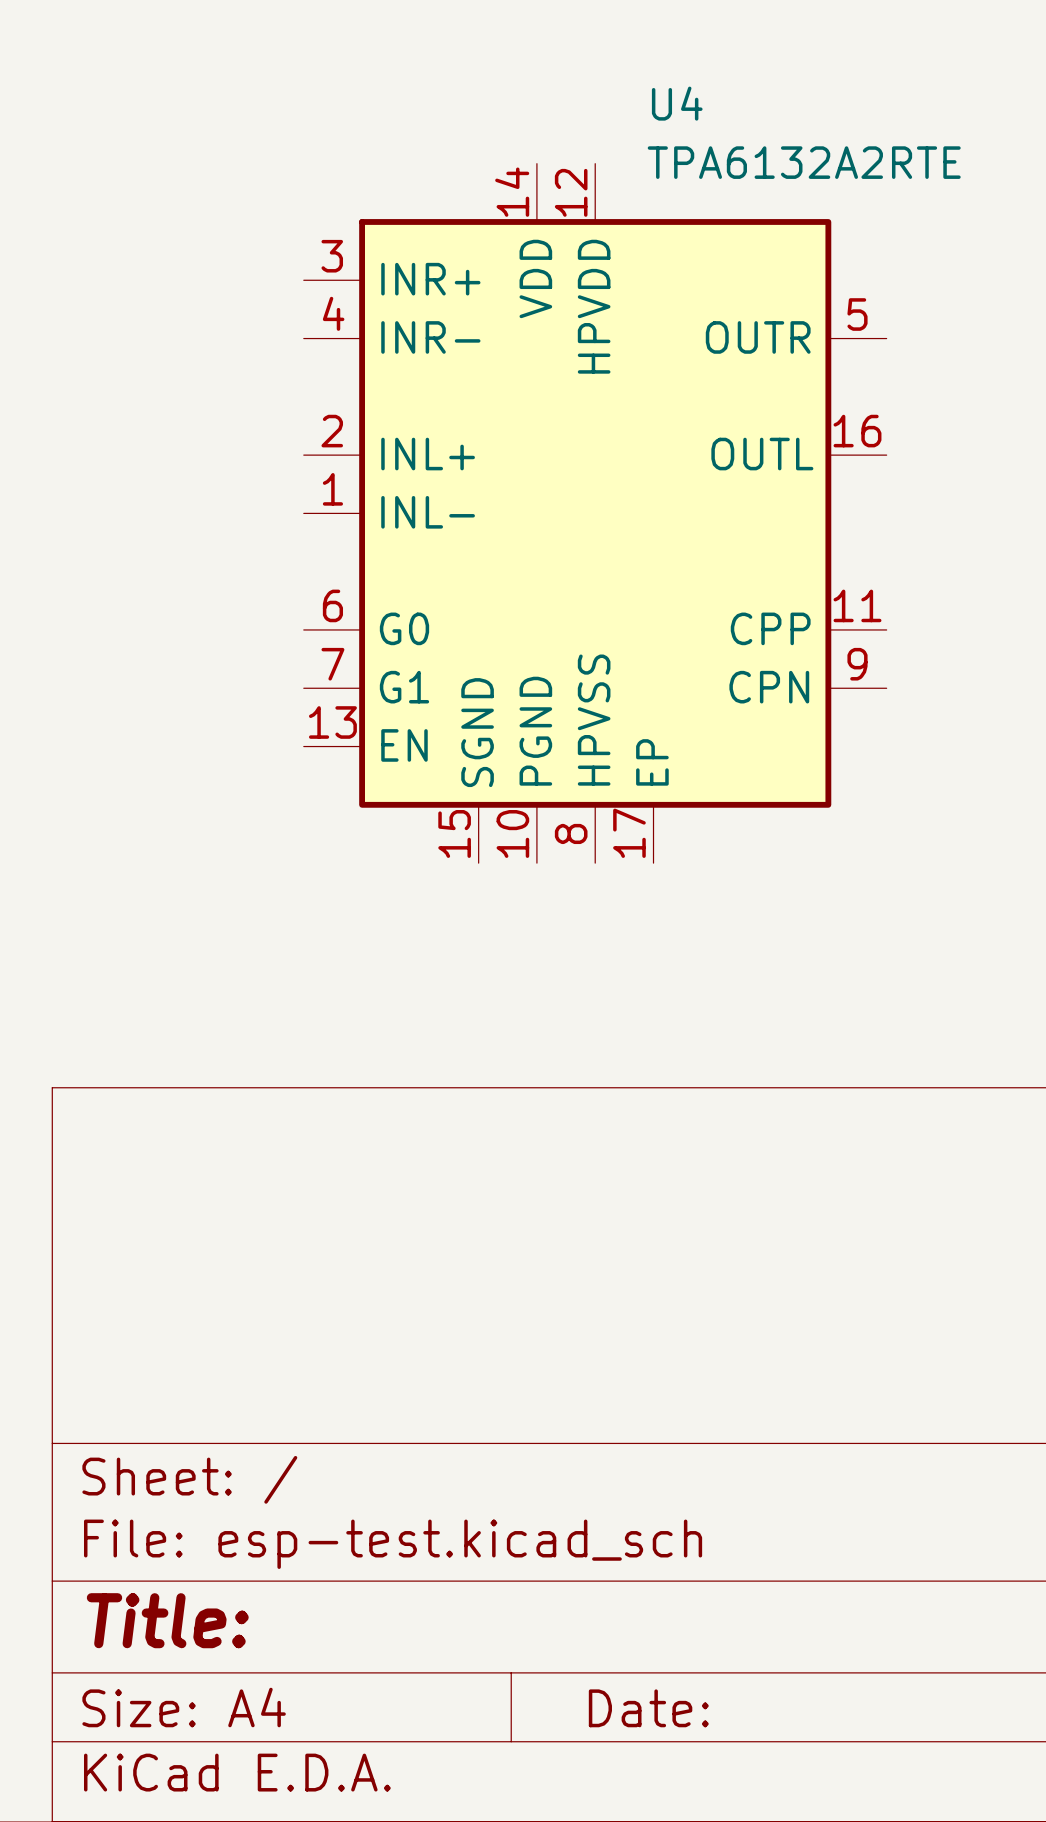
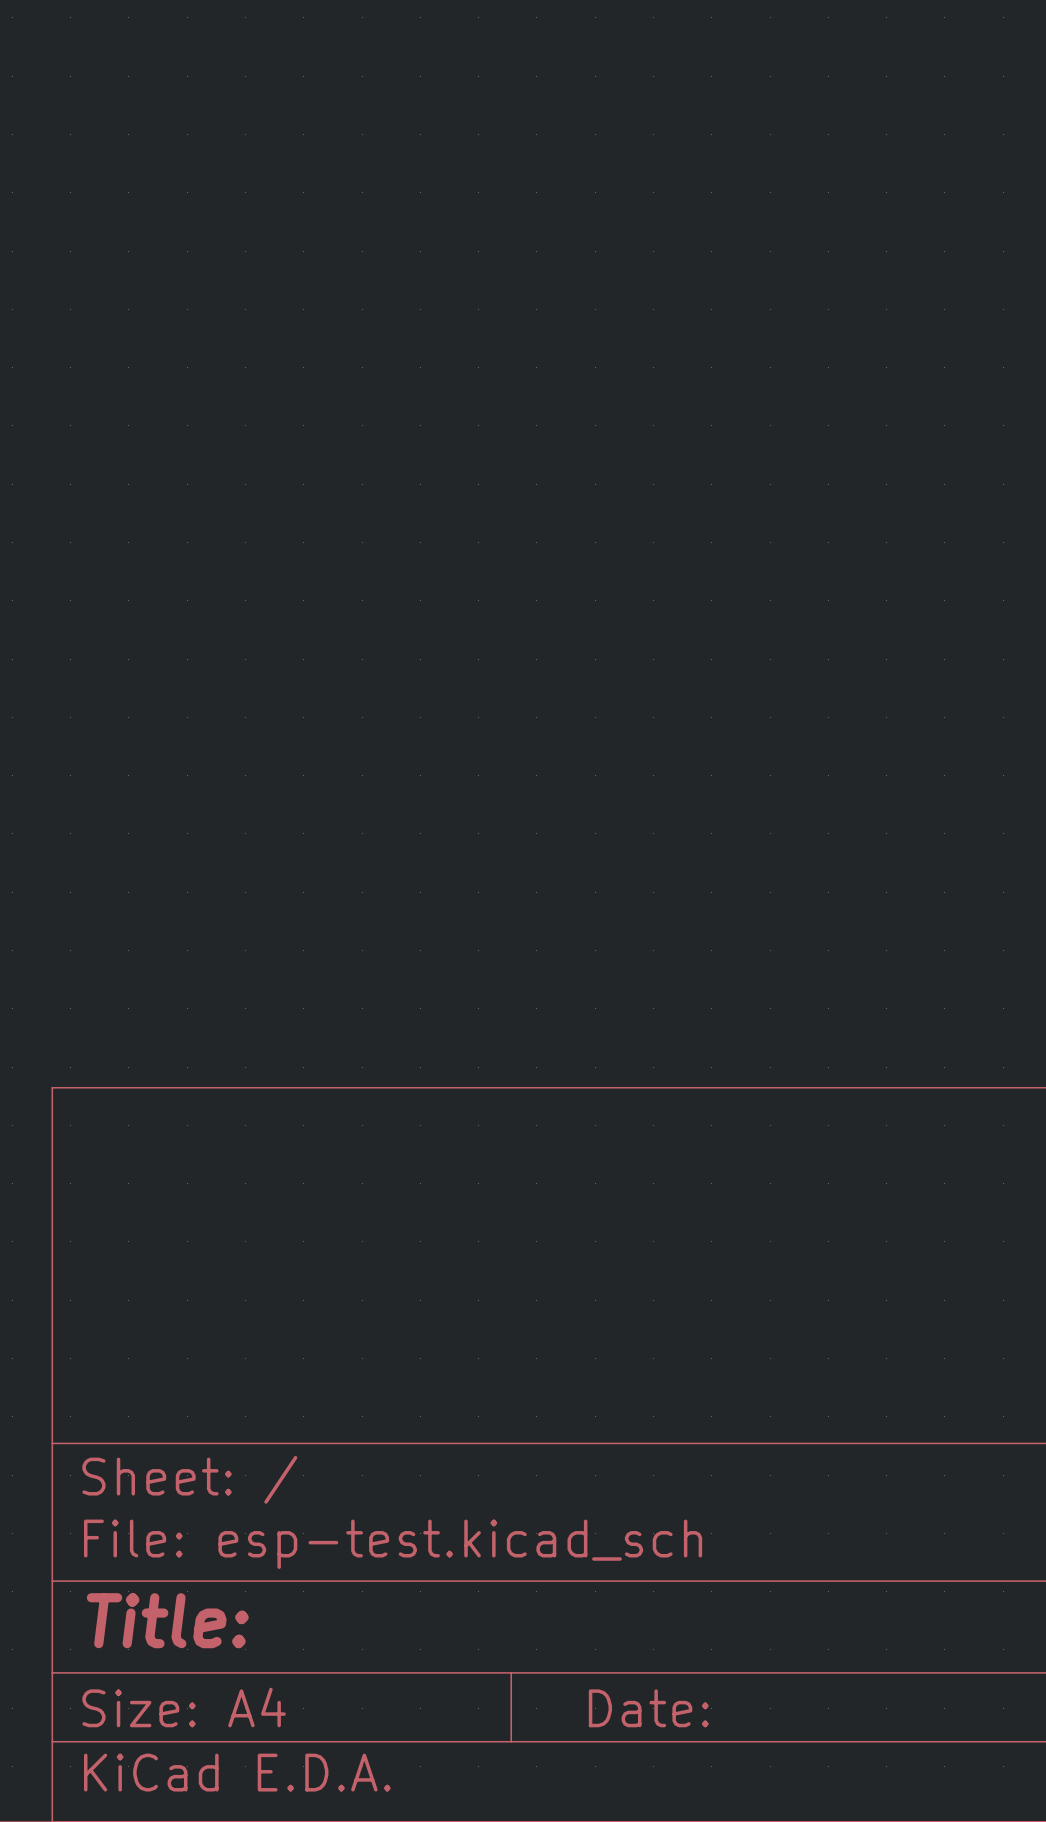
U4: TPA6132A2RTE (595, 513) -> none

